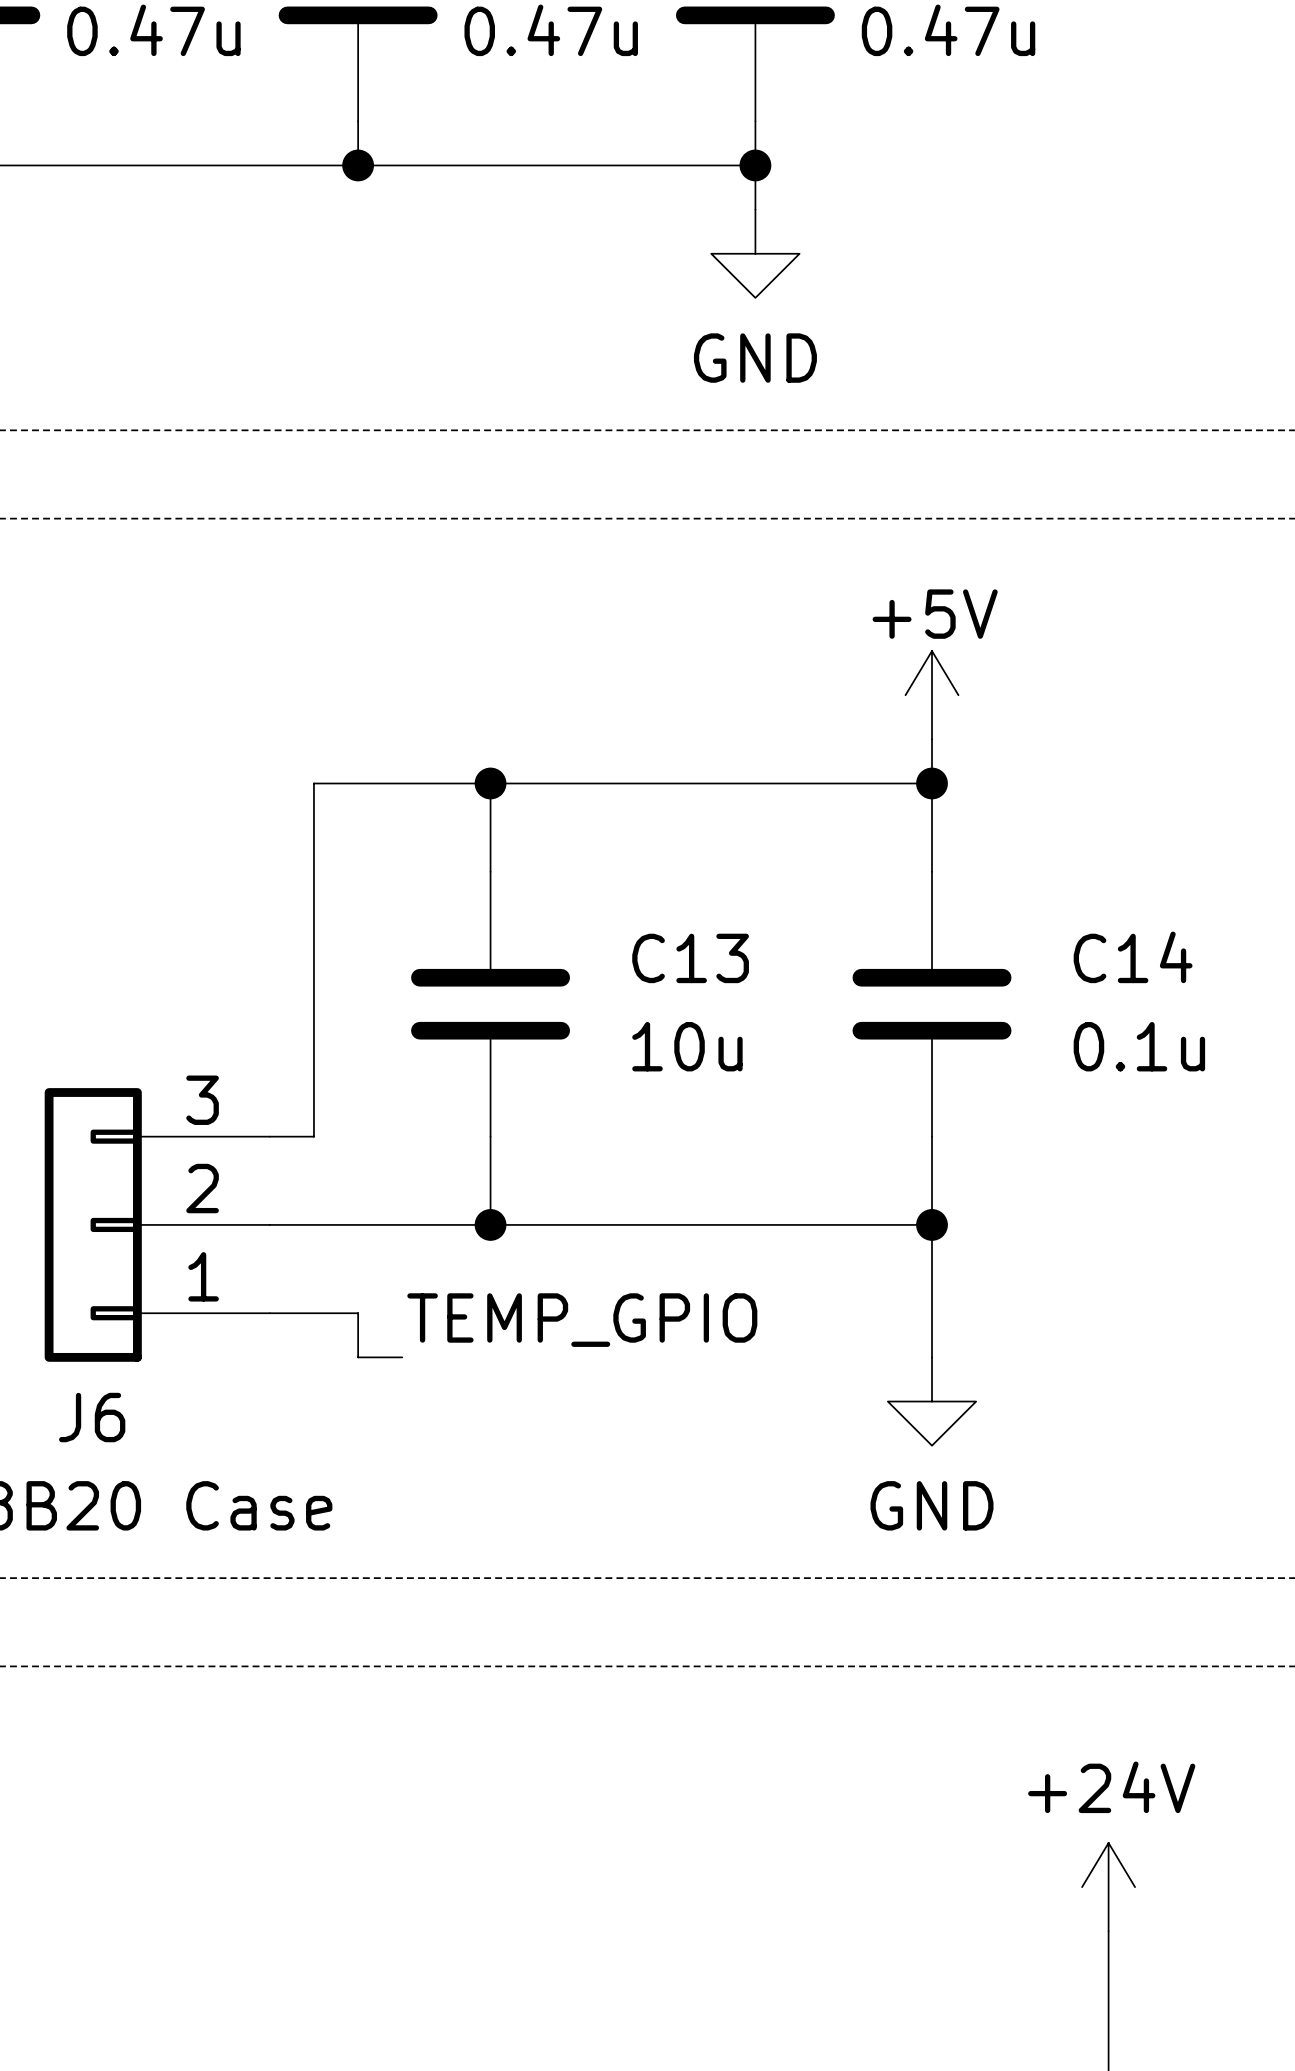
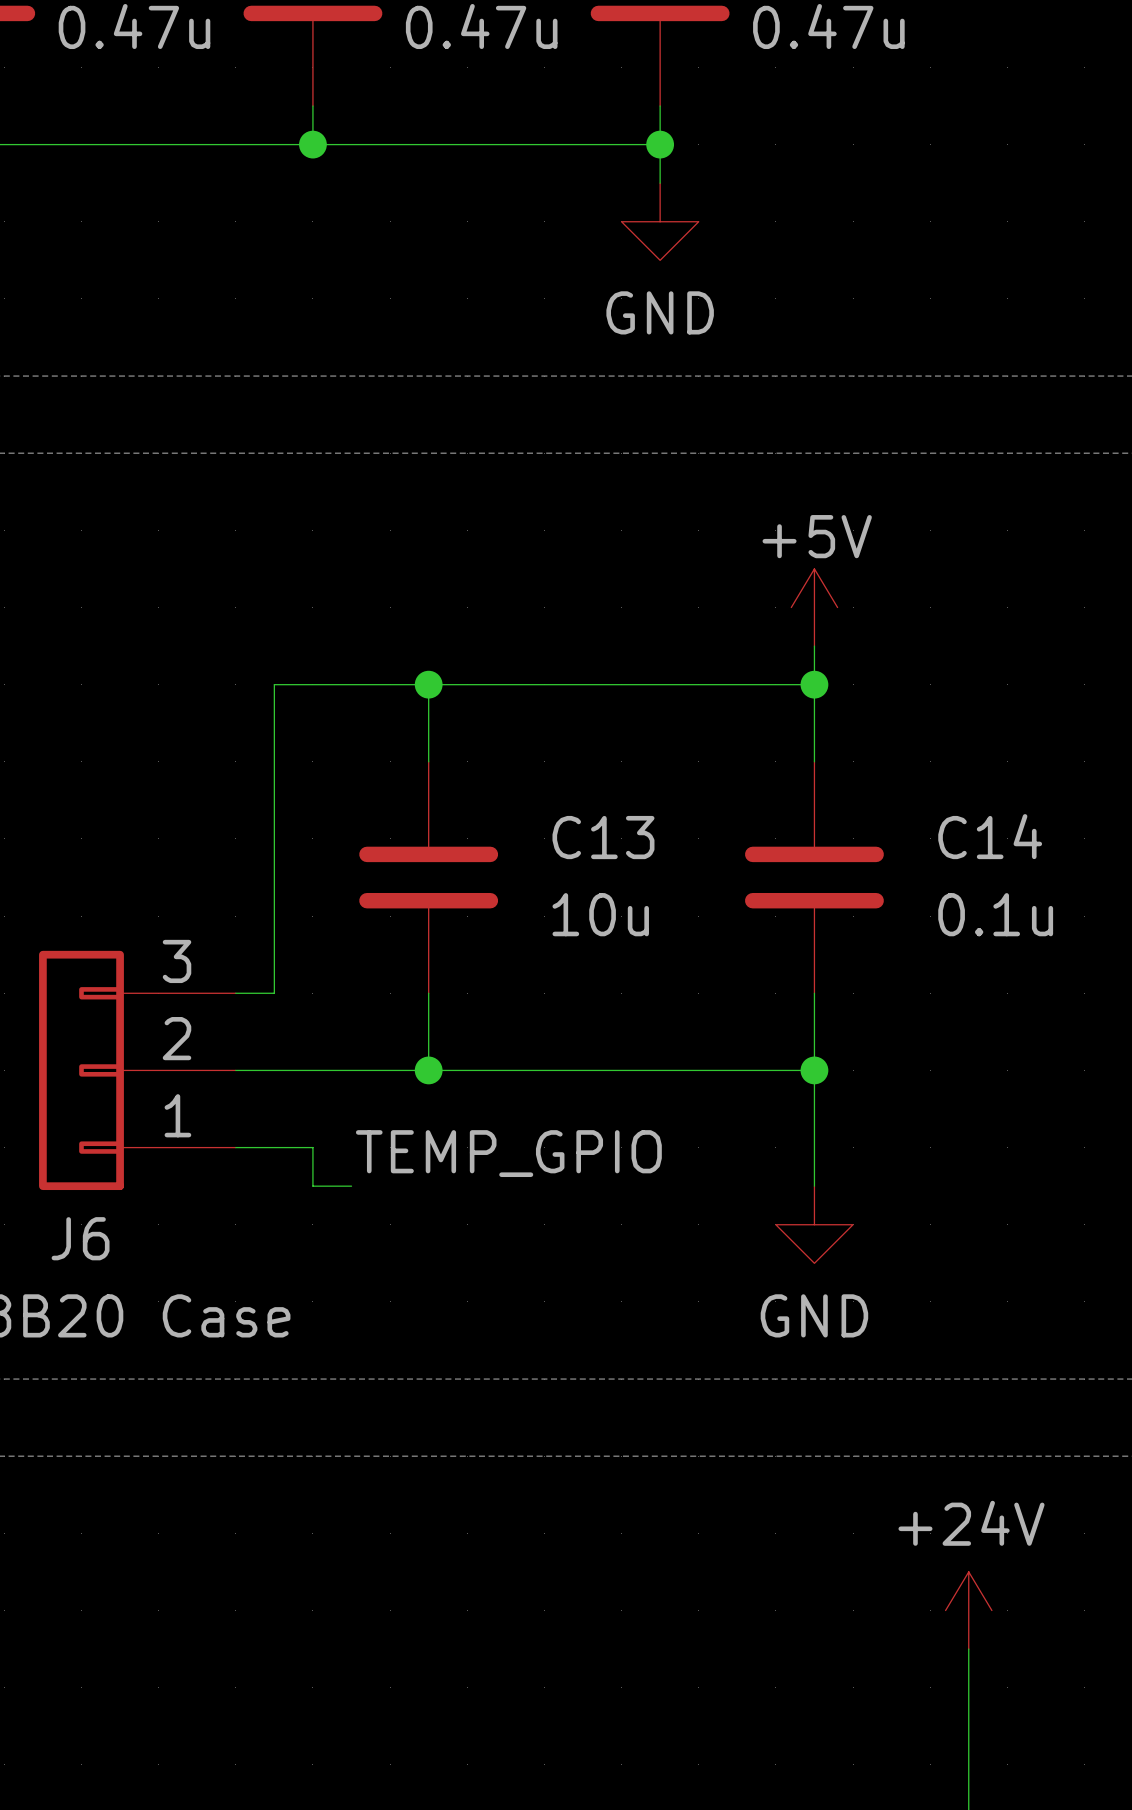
power symbol position: +24V (1108, 1887) -> +24V (968, 1610)

